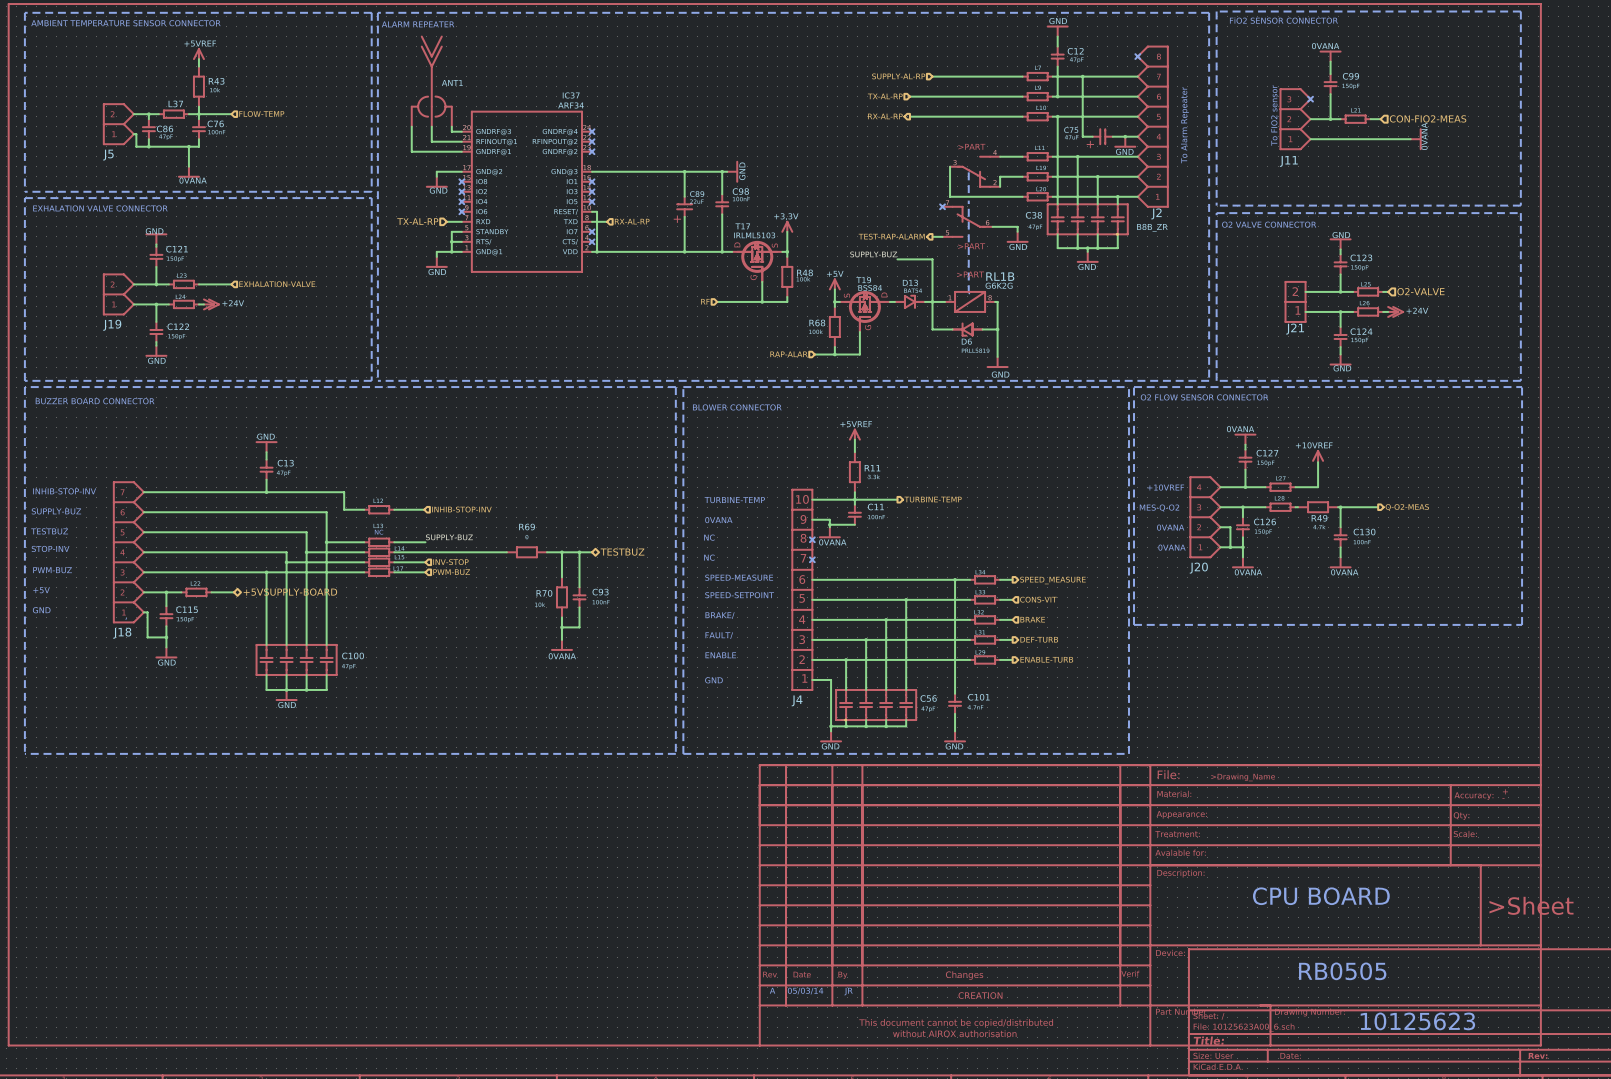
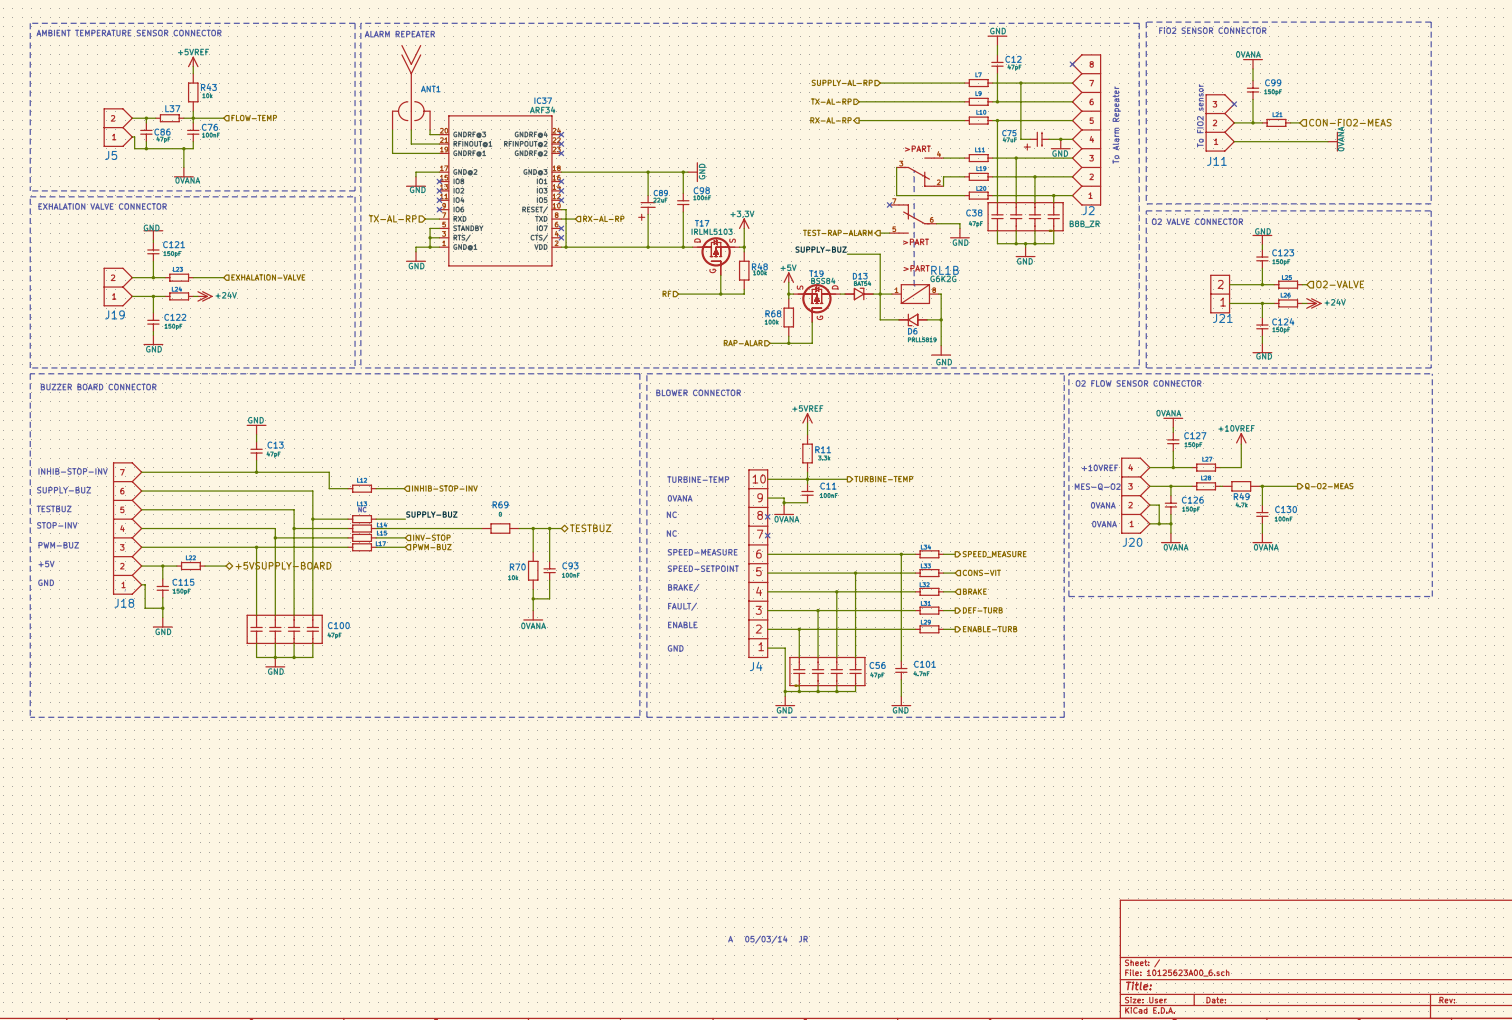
drawing: [8, 4, 1541, 1046] -> none
text: CPU BOARD (1321, 896) -> none
text: RB0505 (1342, 971) -> none
text: 10125623 (1417, 1021) -> none

